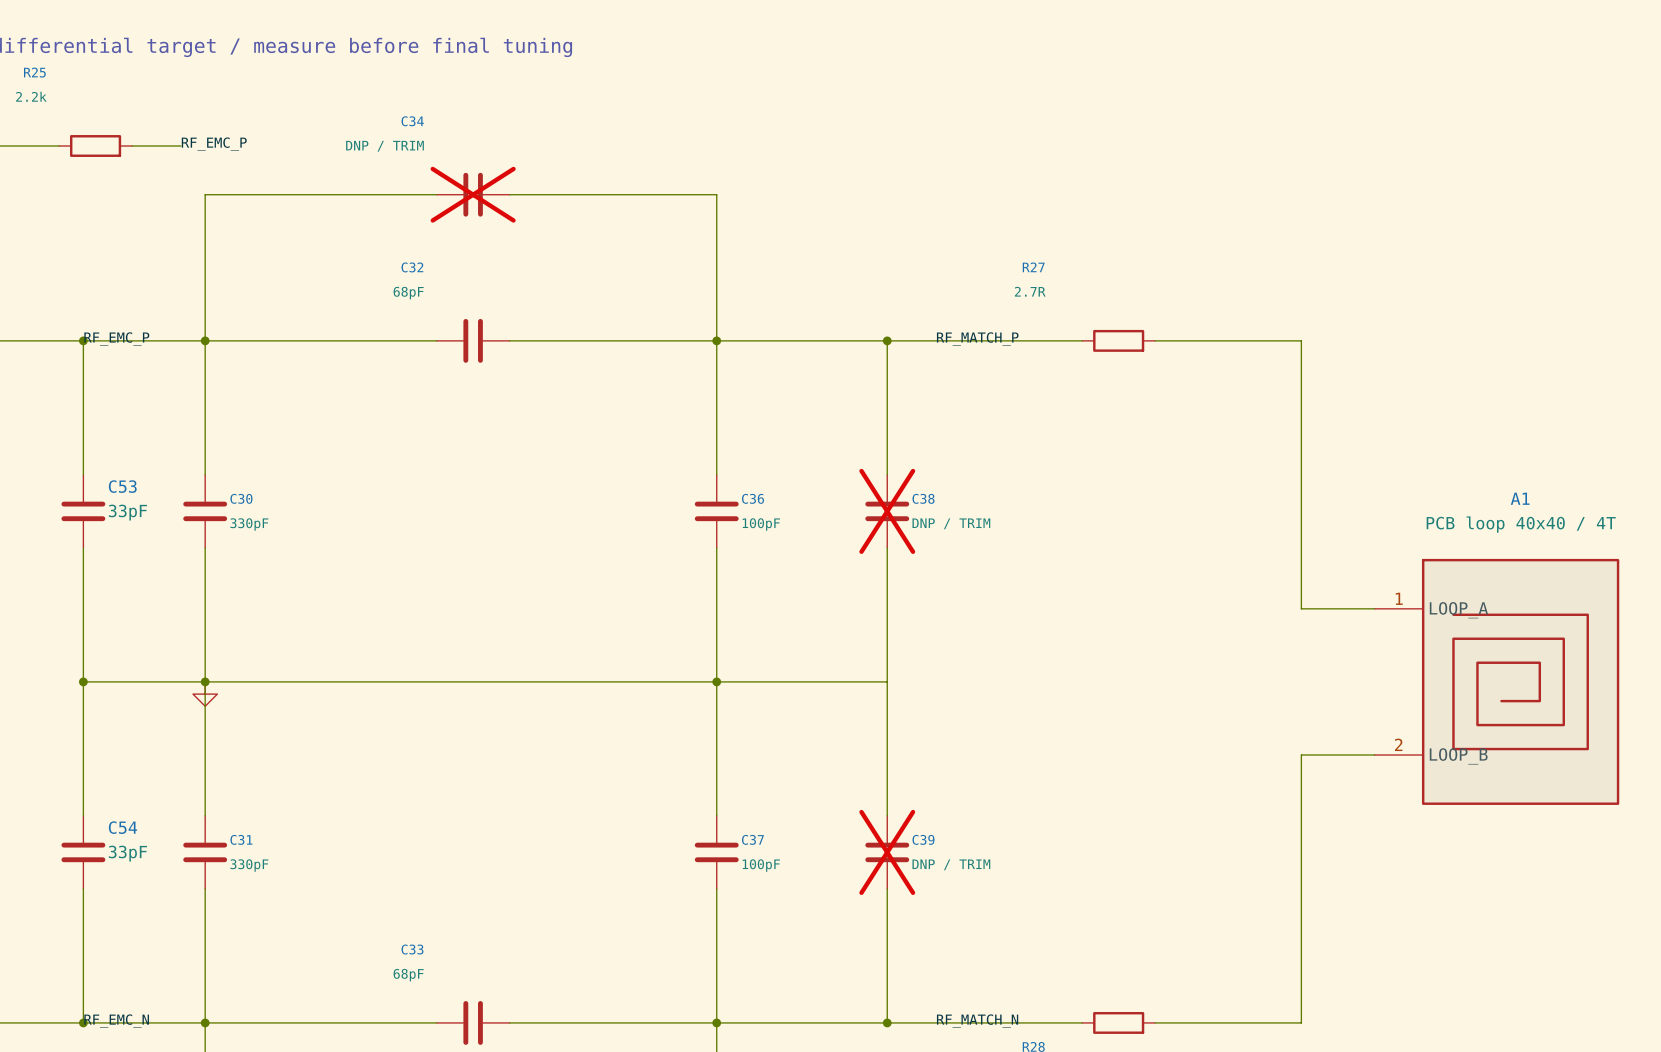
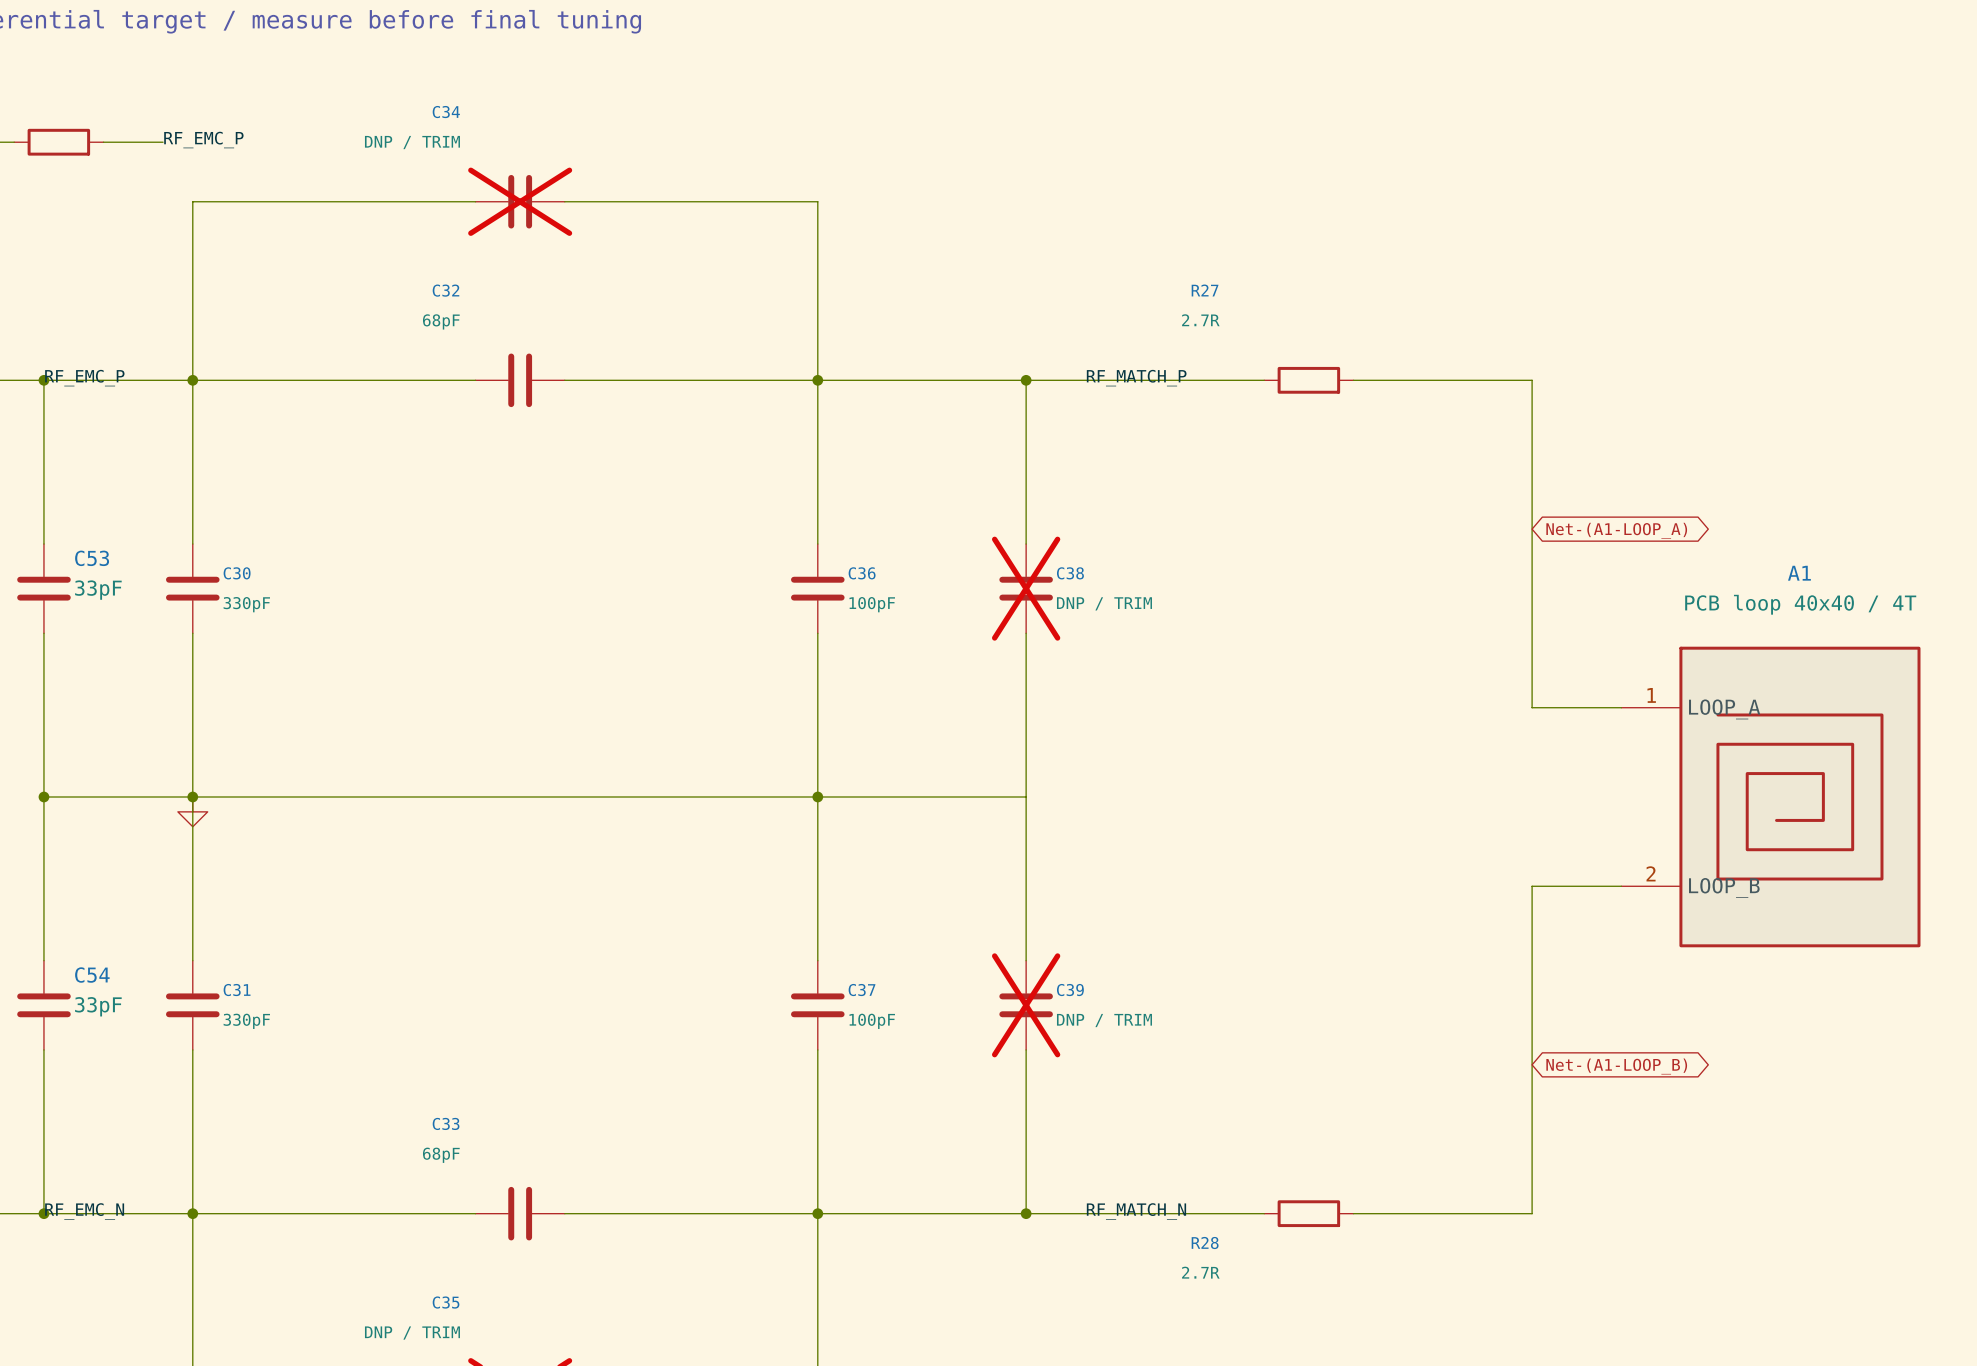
global label: none -> Net-(A1-LOOP_A) (1616, 530)
global label: none -> Net-(A1-LOOP_B) (1616, 1066)

